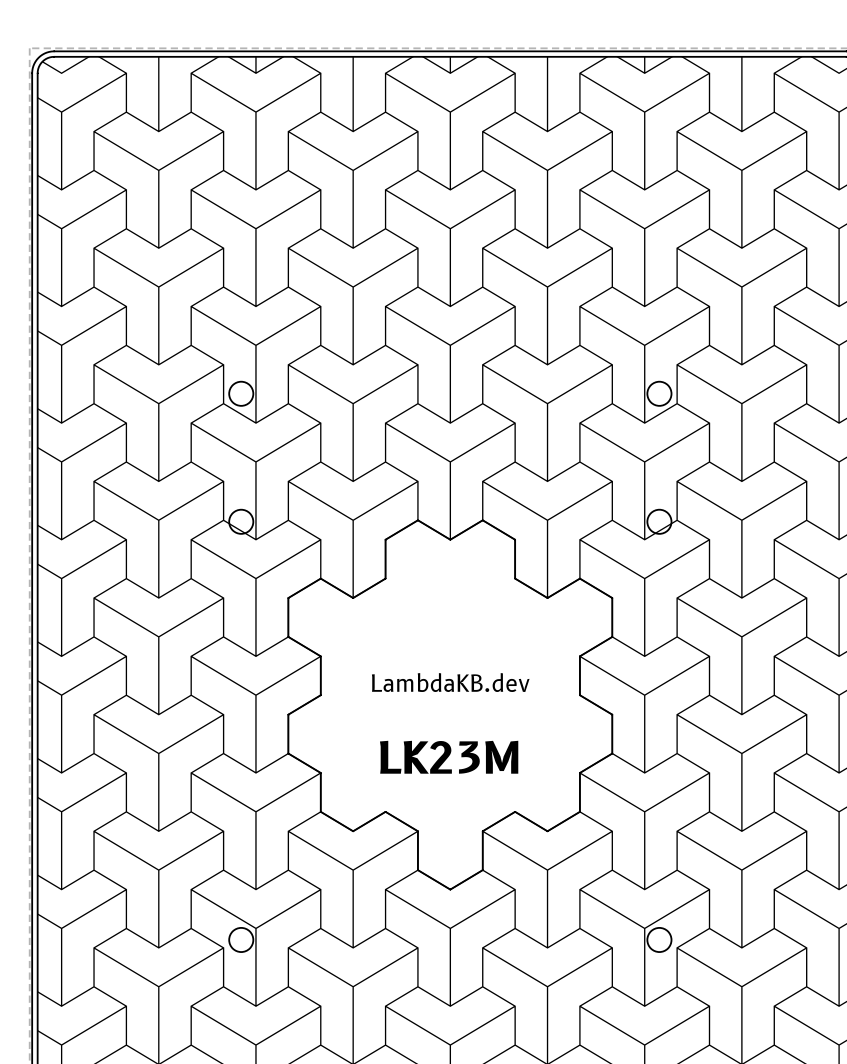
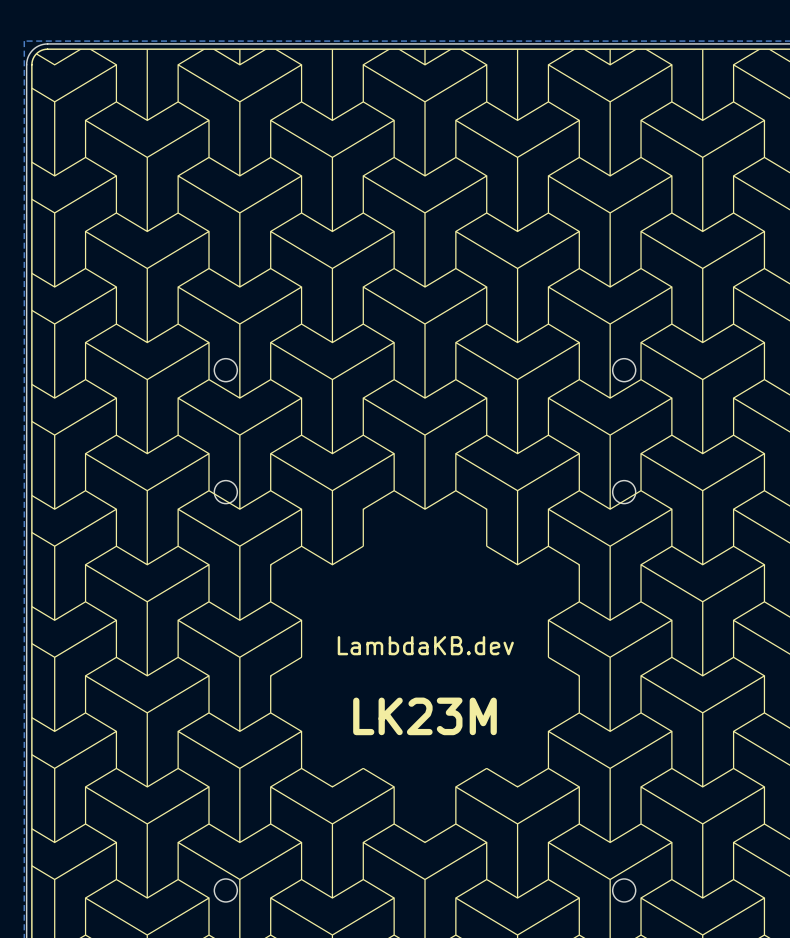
line: (482, 520) (515, 539) (515, 578) (547, 598) (579, 578) (612, 598) (612, 636) (579, 656) (579, 695) (612, 714) (612, 753) (579, 772) (579, 811) (547, 831) (515, 811) (482, 831) (482, 870) (450, 889) (417, 870) (417, 831) (385, 811) (353, 831) (320, 811) (320, 772) (288, 753) (288, 714) (320, 695) (320, 656) (288, 636) (288, 598) (320, 578) (353, 598) (385, 578) (385, 539) (417, 520) (450, 539) (482, 520) -> none

